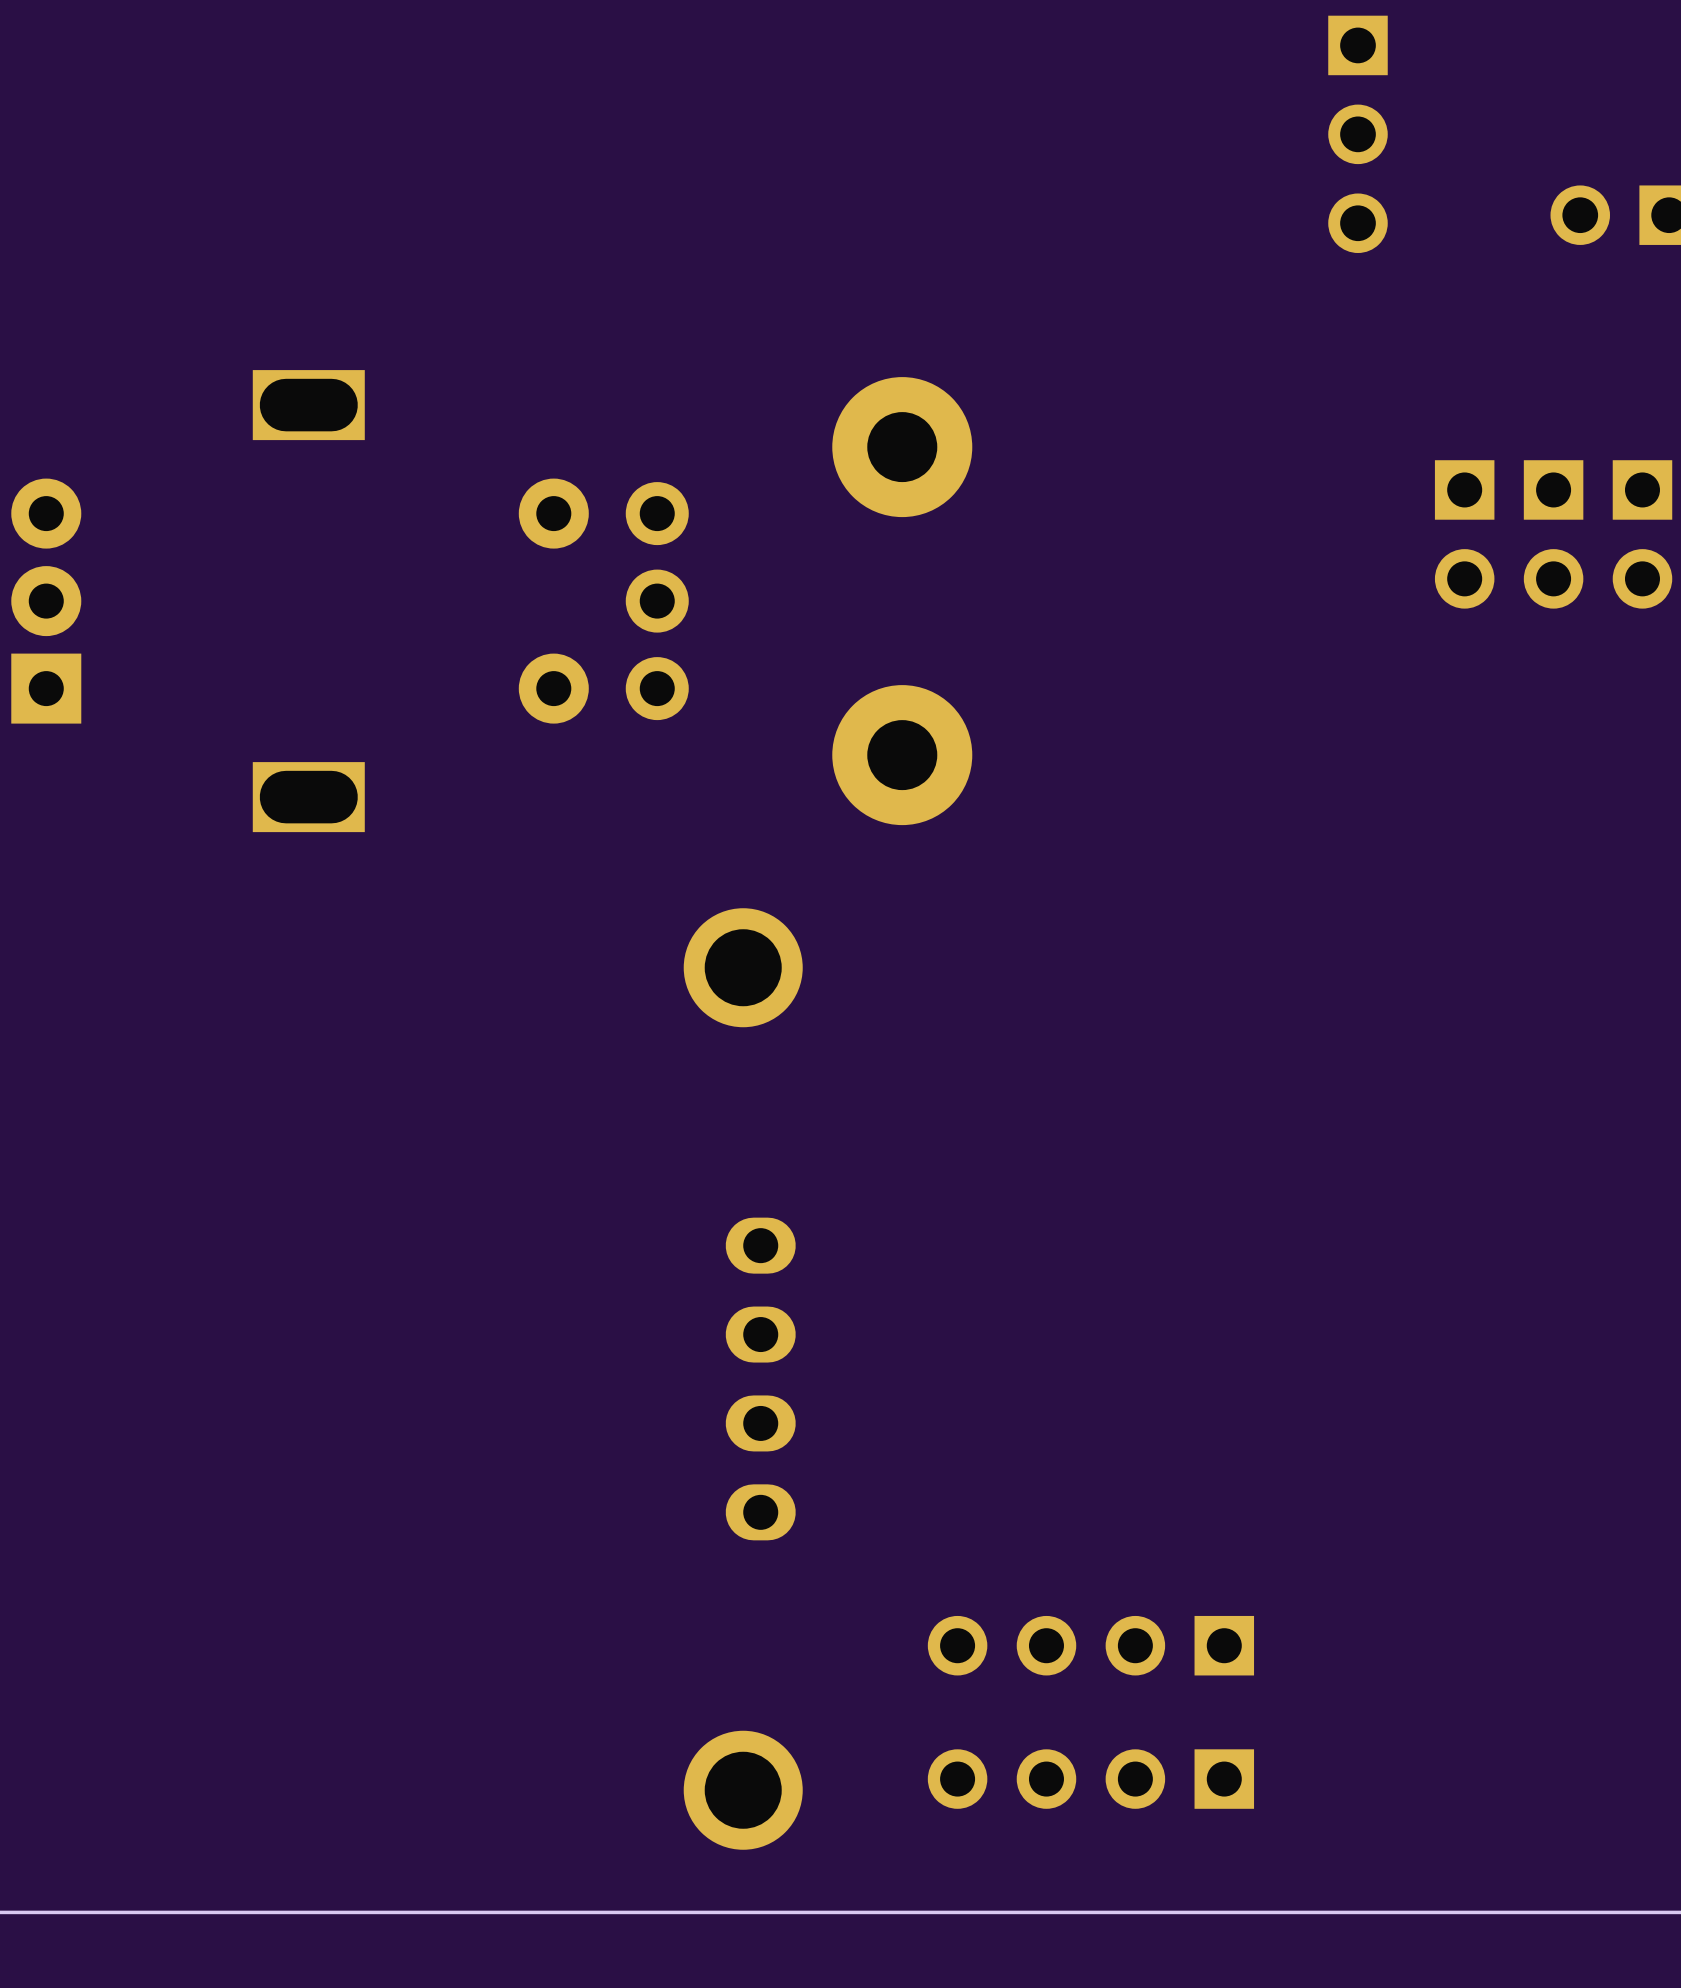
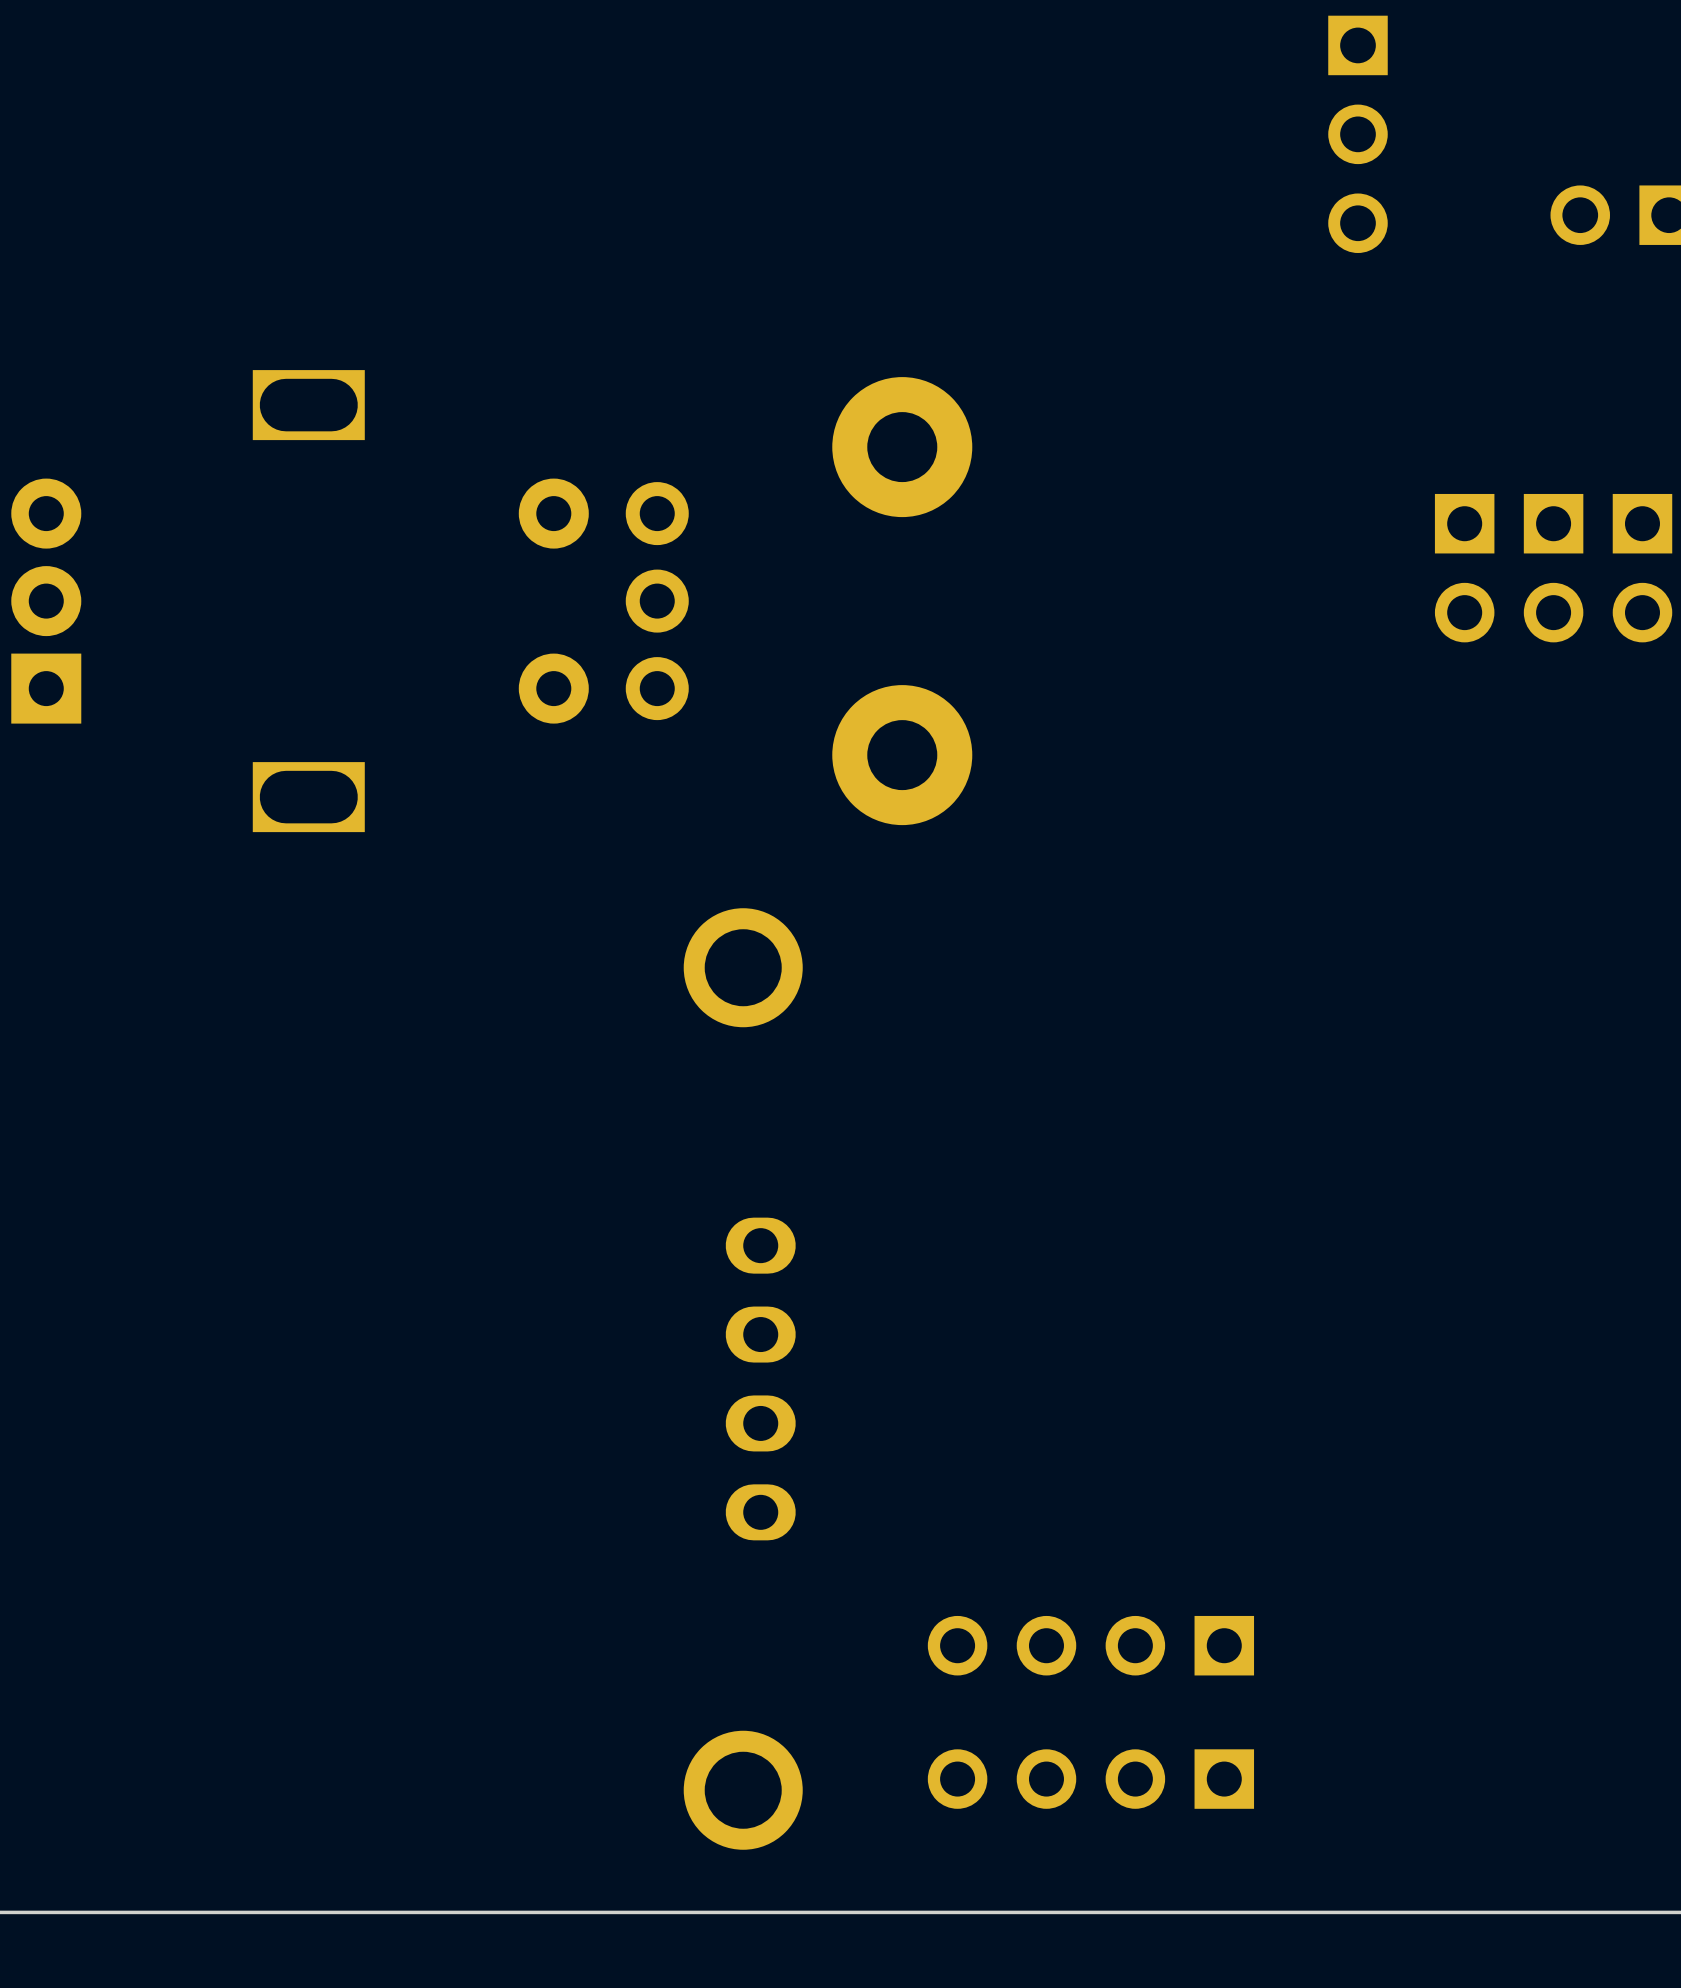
part position: (1464, 534) -> (1464, 568)
part position: (1553, 534) -> (1553, 568)
part position: (1642, 534) -> (1642, 568)

